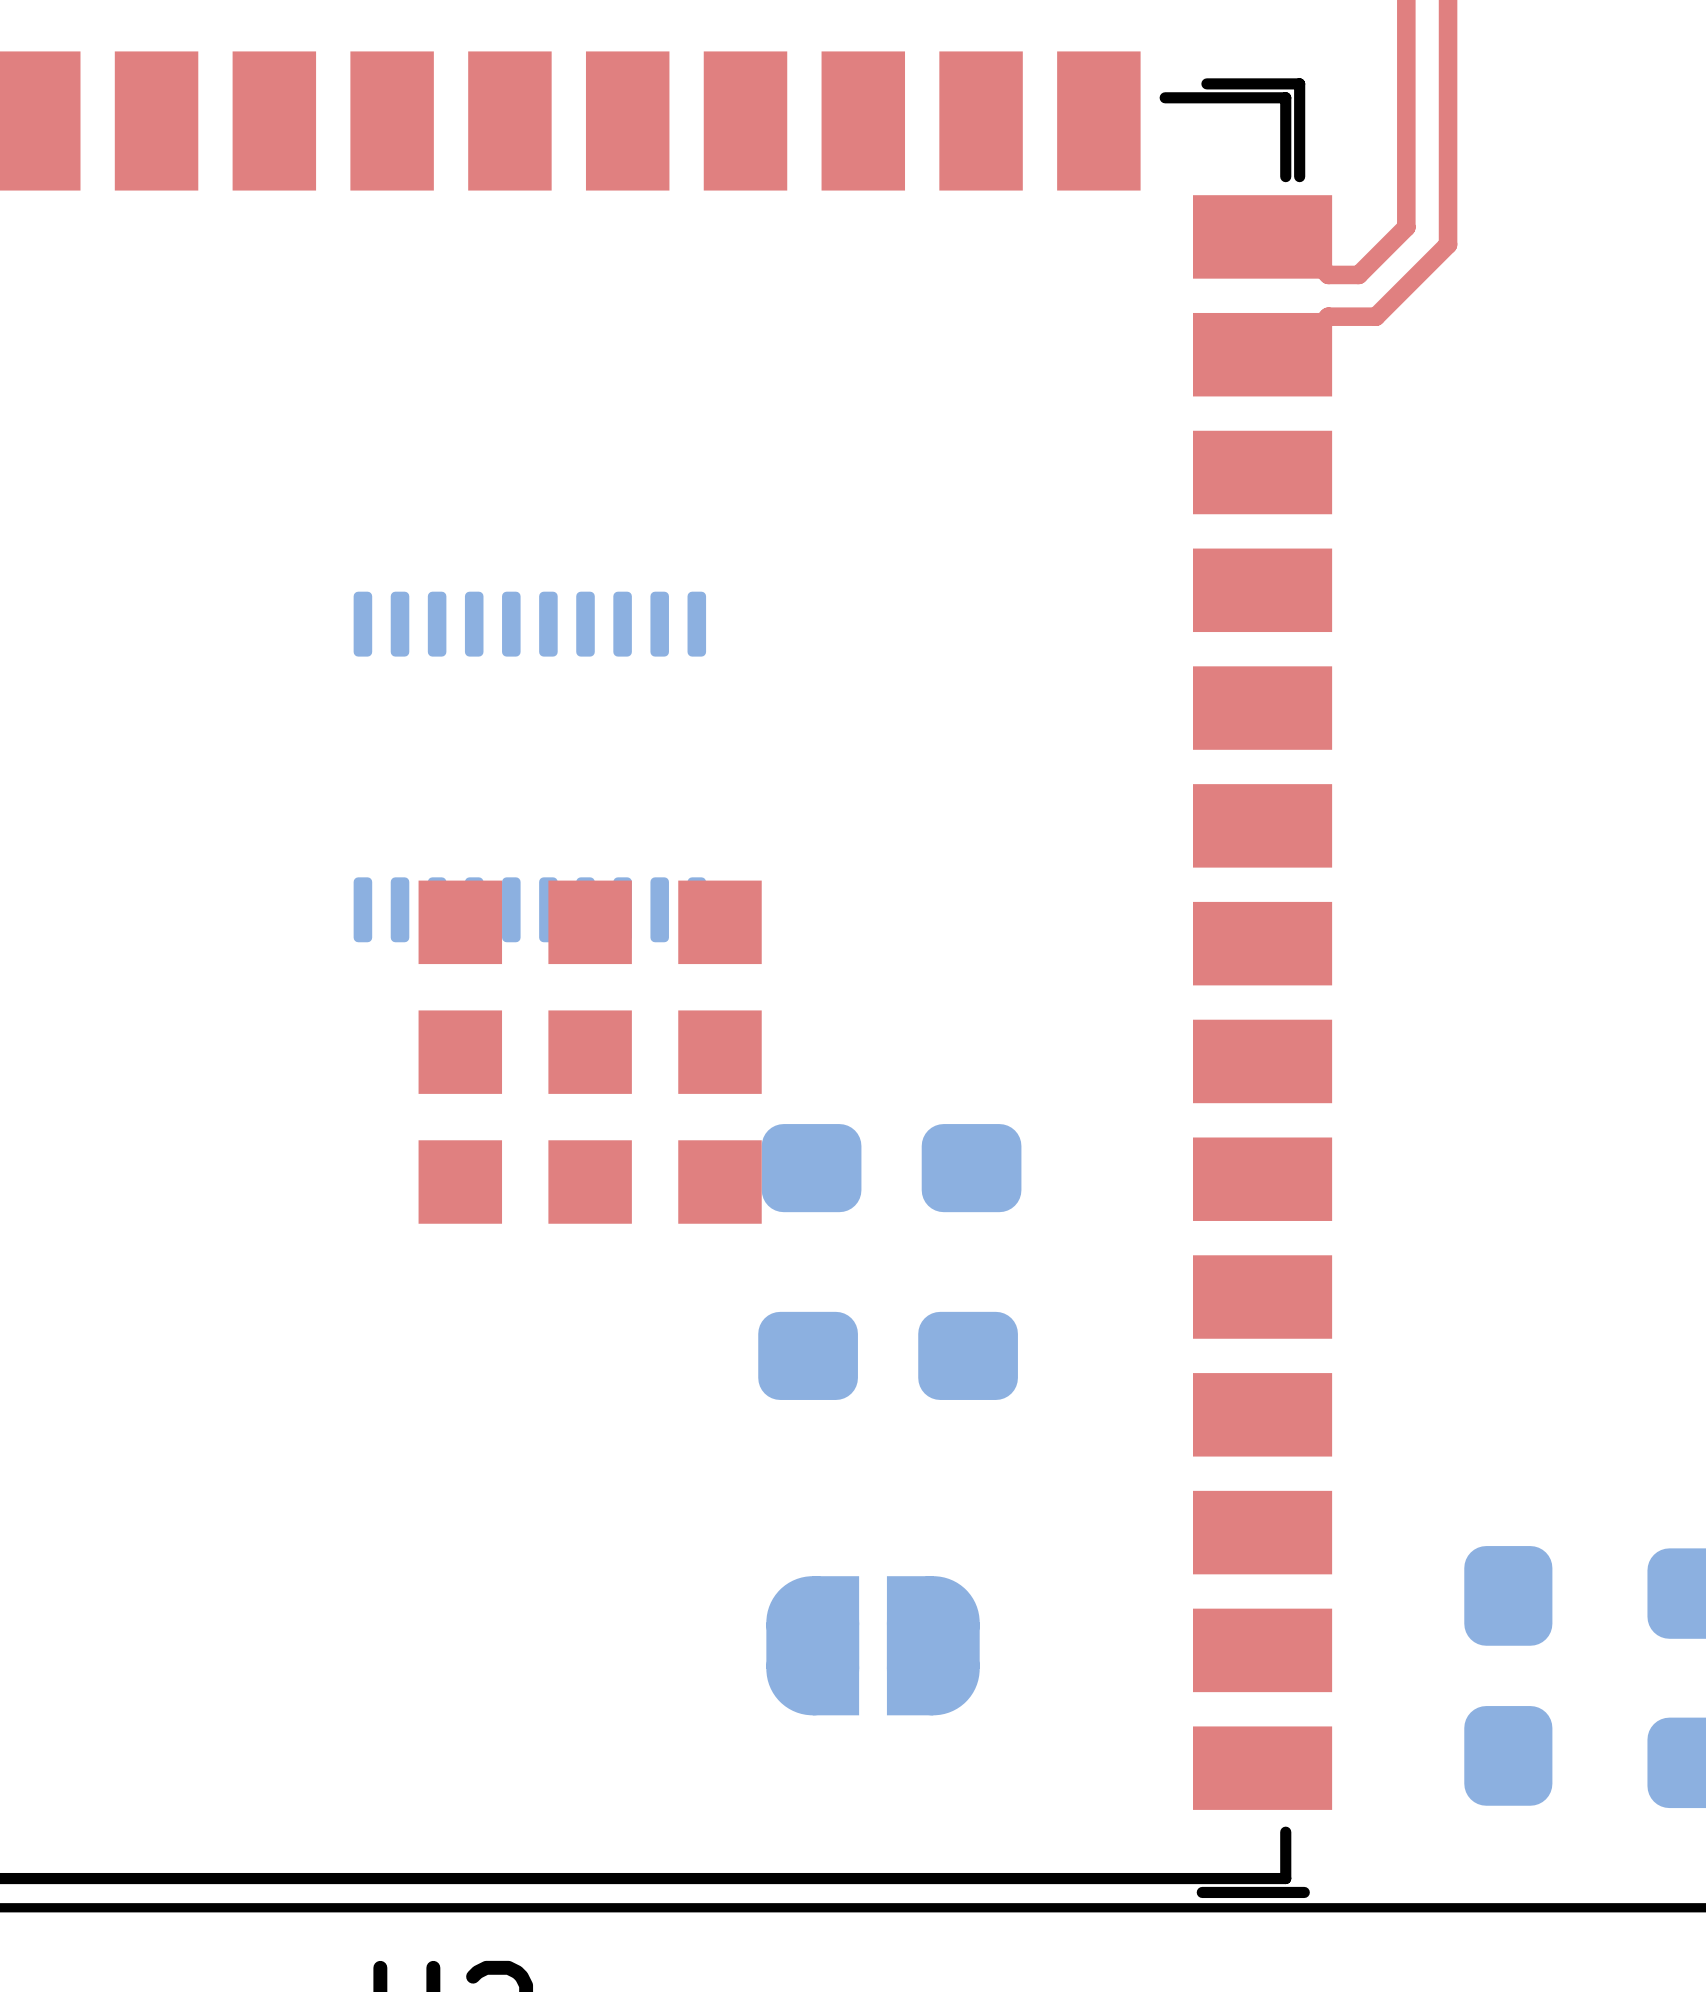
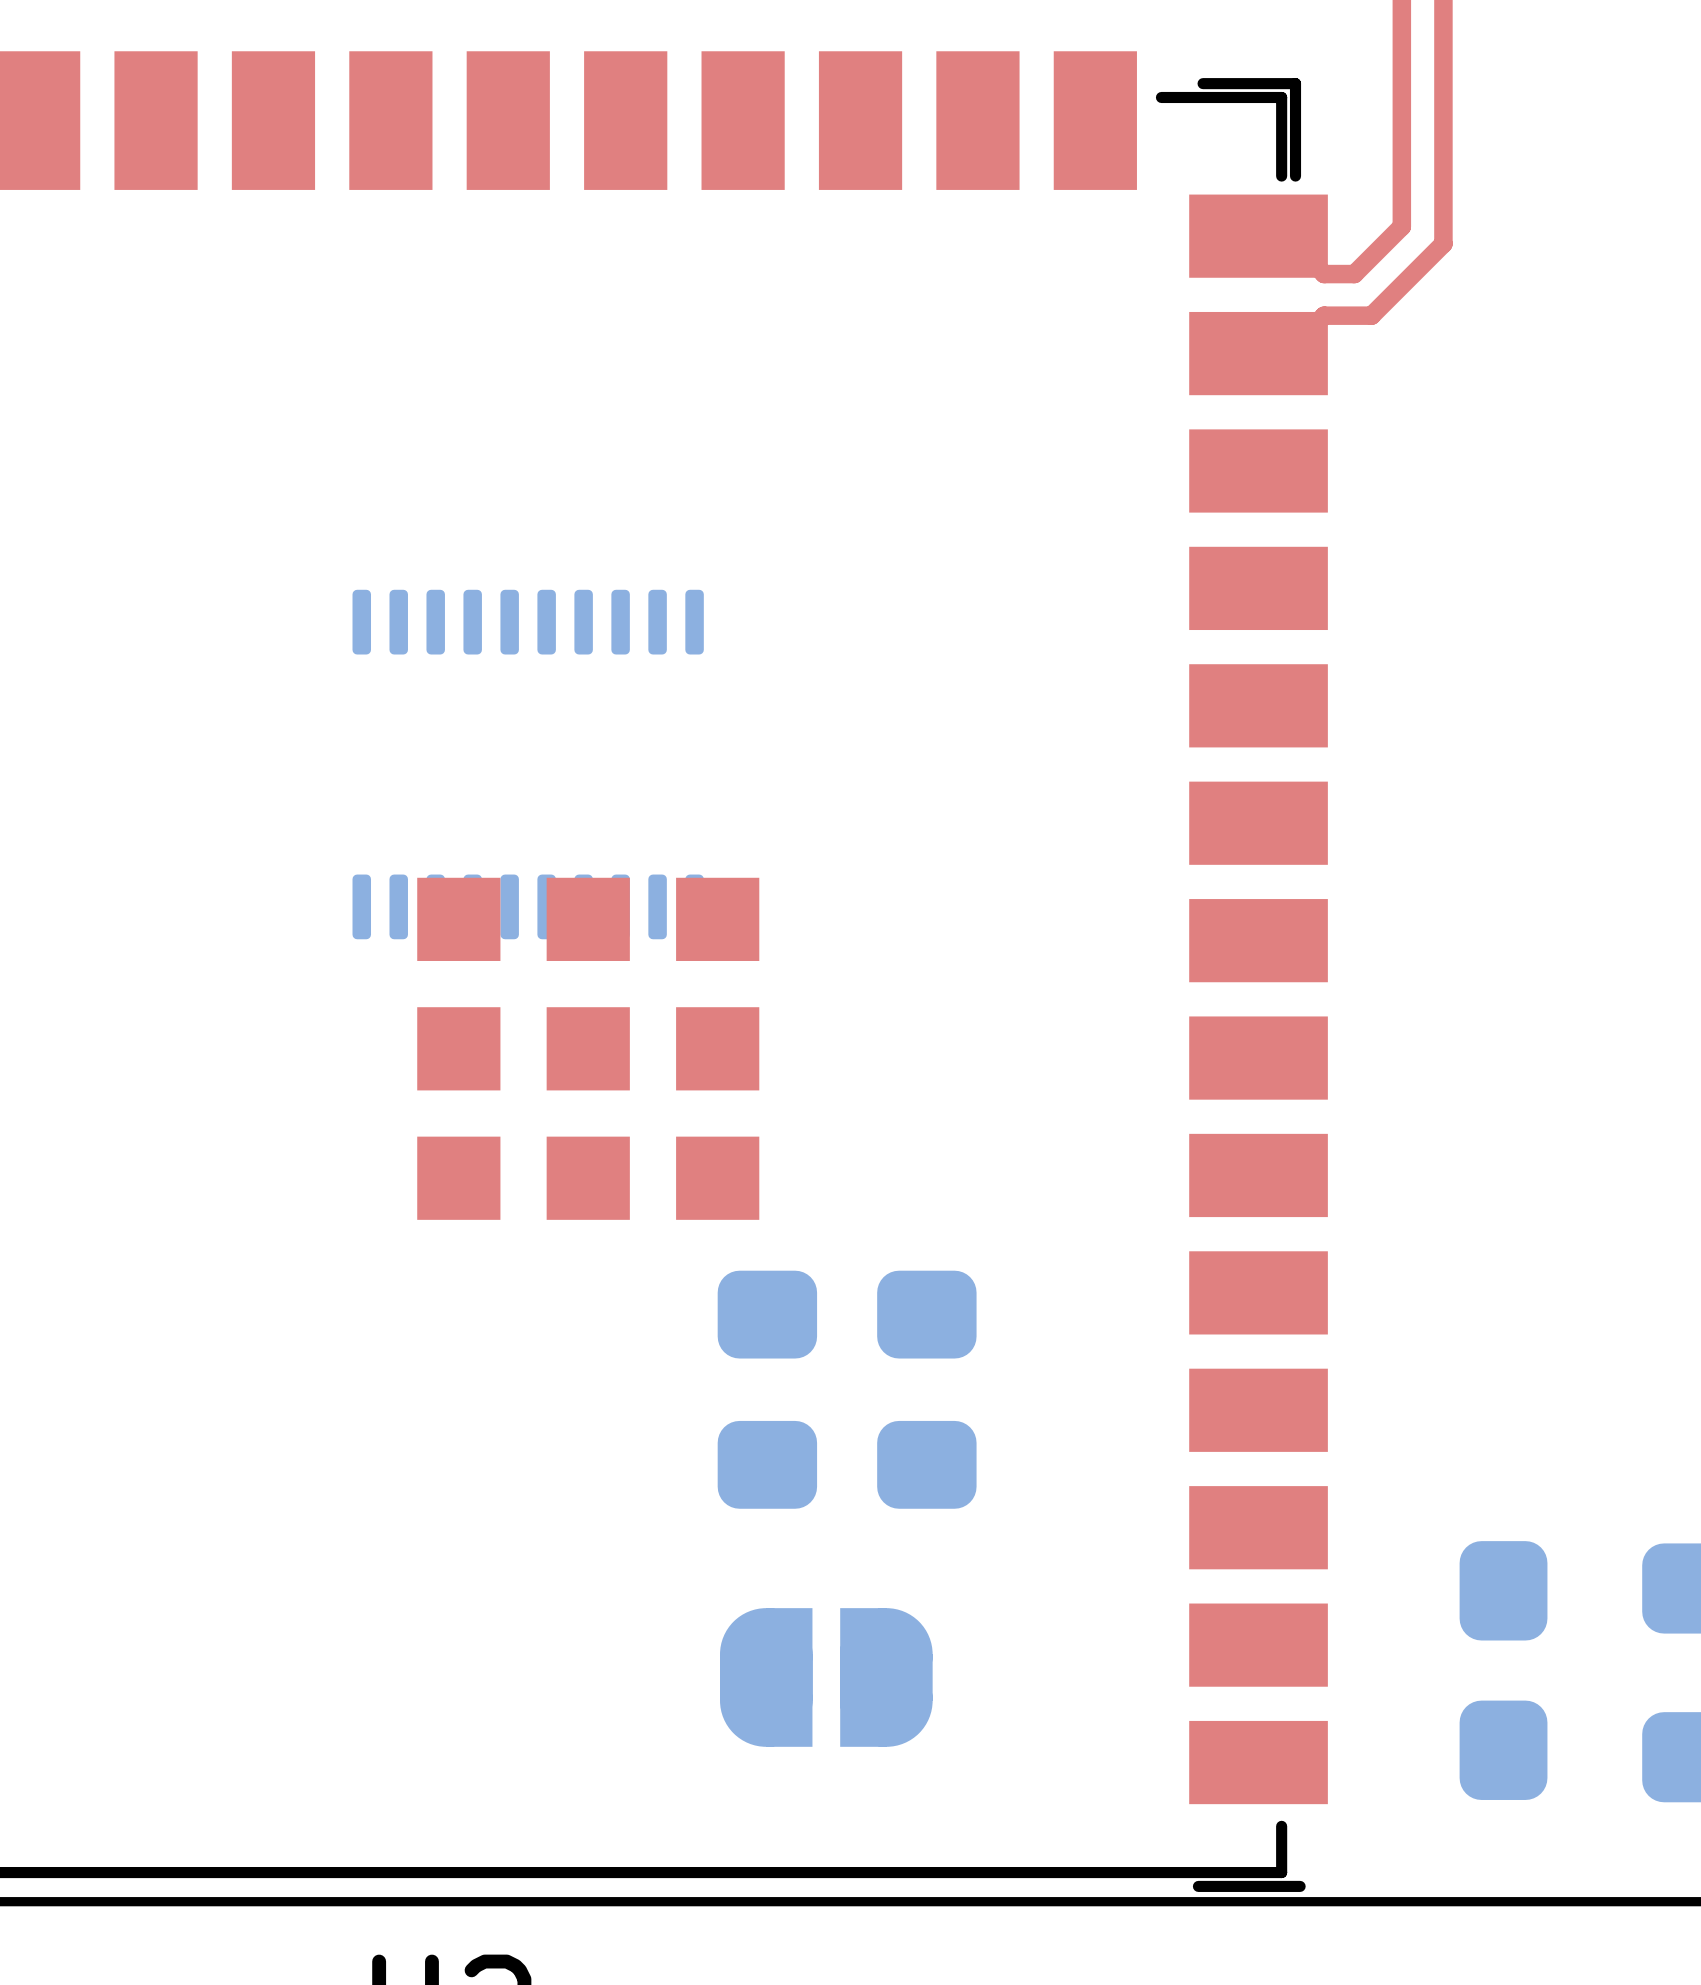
part position: (891, 1168) -> (847, 1464)
part position: (888, 1355) -> (847, 1314)
part position: (873, 1645) -> (826, 1677)

